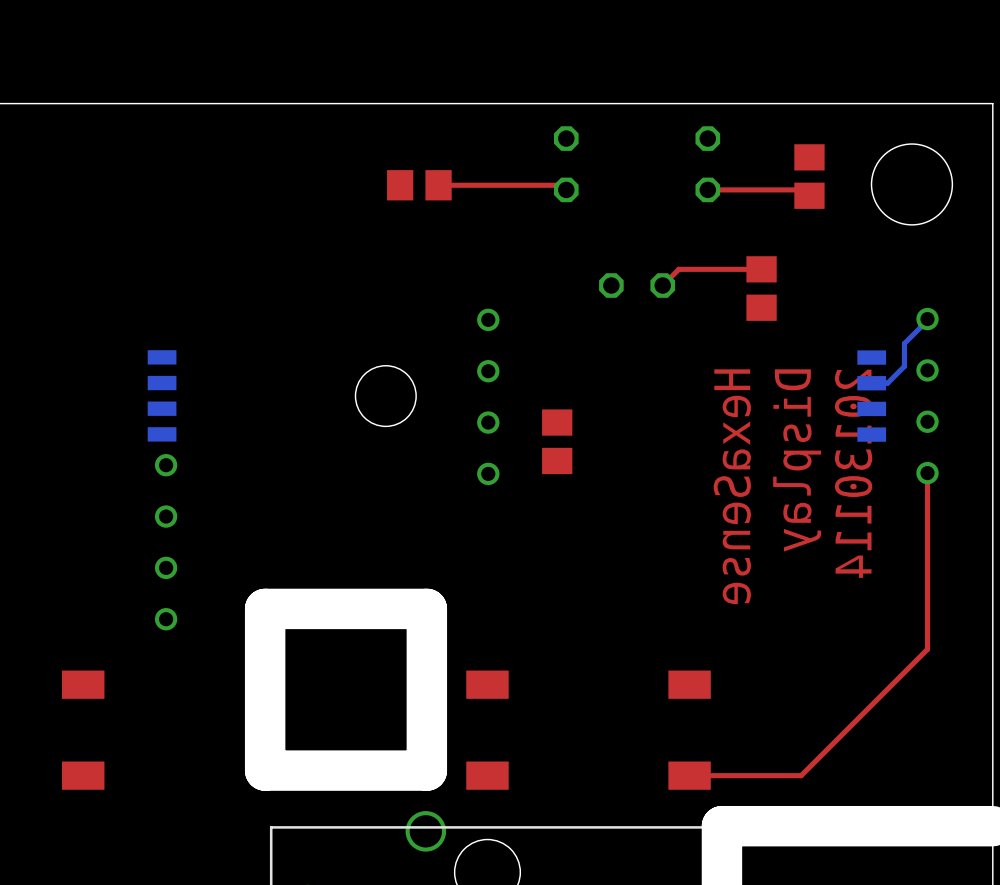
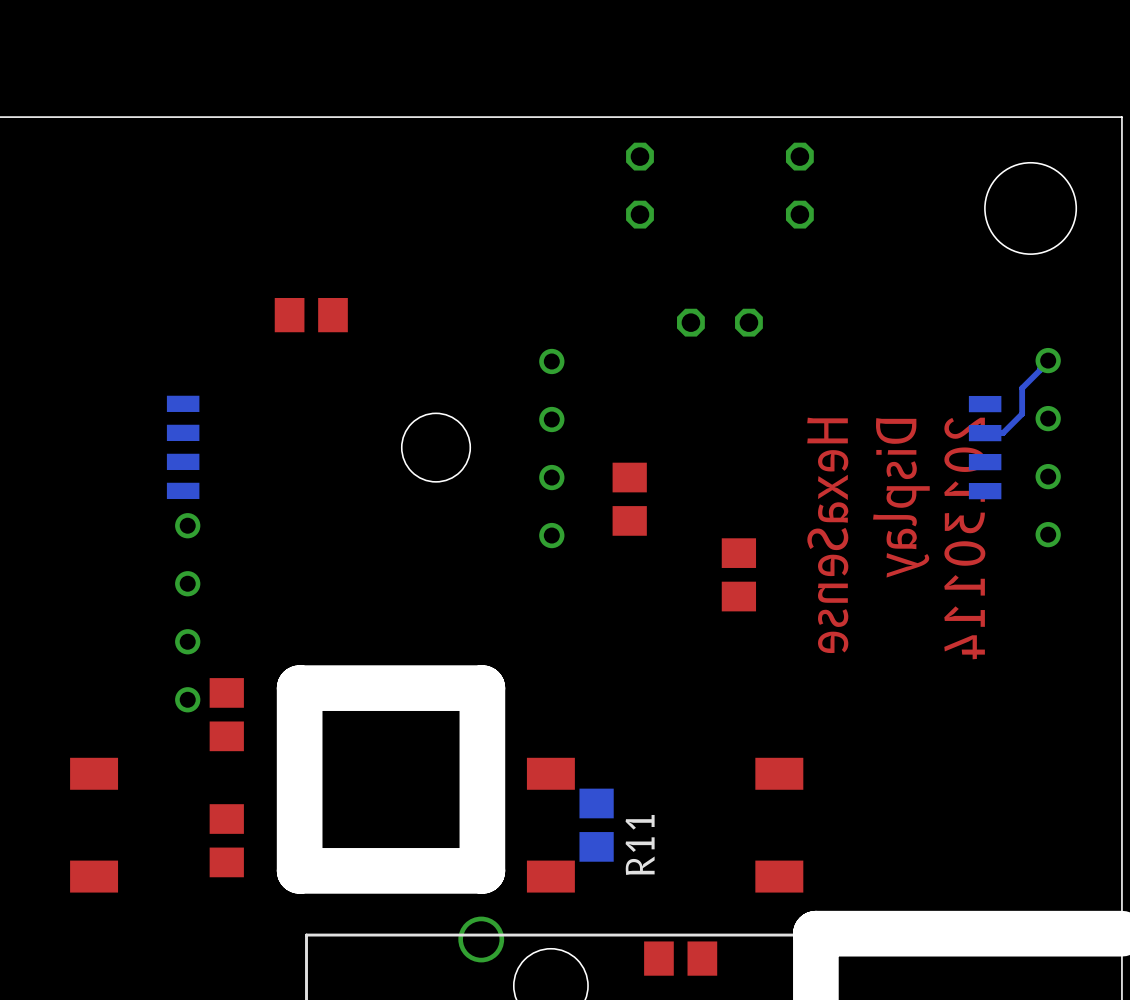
part: (809, 176) -> none
part position: (419, 185) -> (311, 315)
top track: (438, 185) (561, 185) (566, 189) -> none
top track: (707, 189) (803, 189) (809, 195) -> none
top track: (761, 269) (678, 269) (662, 285) -> none
R11 side: top (761, 288) -> bottom (596, 825)
top track: (927, 473) (927, 649) (801, 775) (689, 775) -> none
part: none -> (738, 574)
part: none -> (226, 714)
part: none -> (226, 840)
part: none -> (680, 958)

